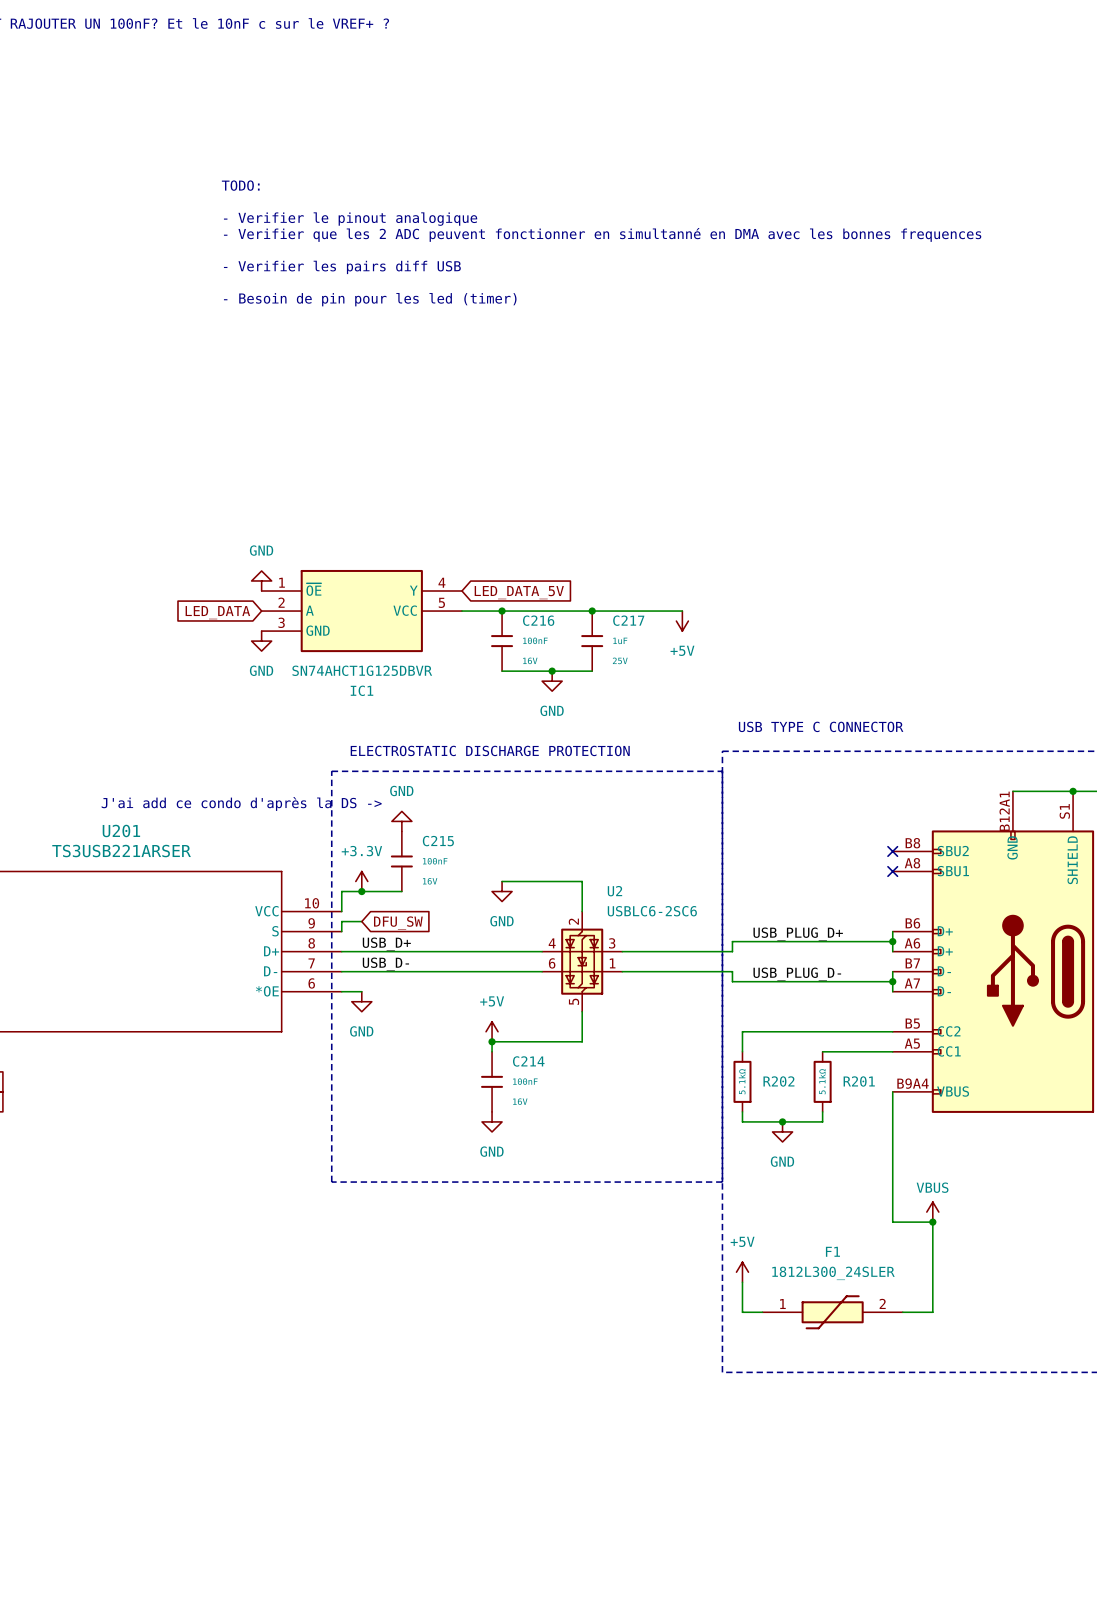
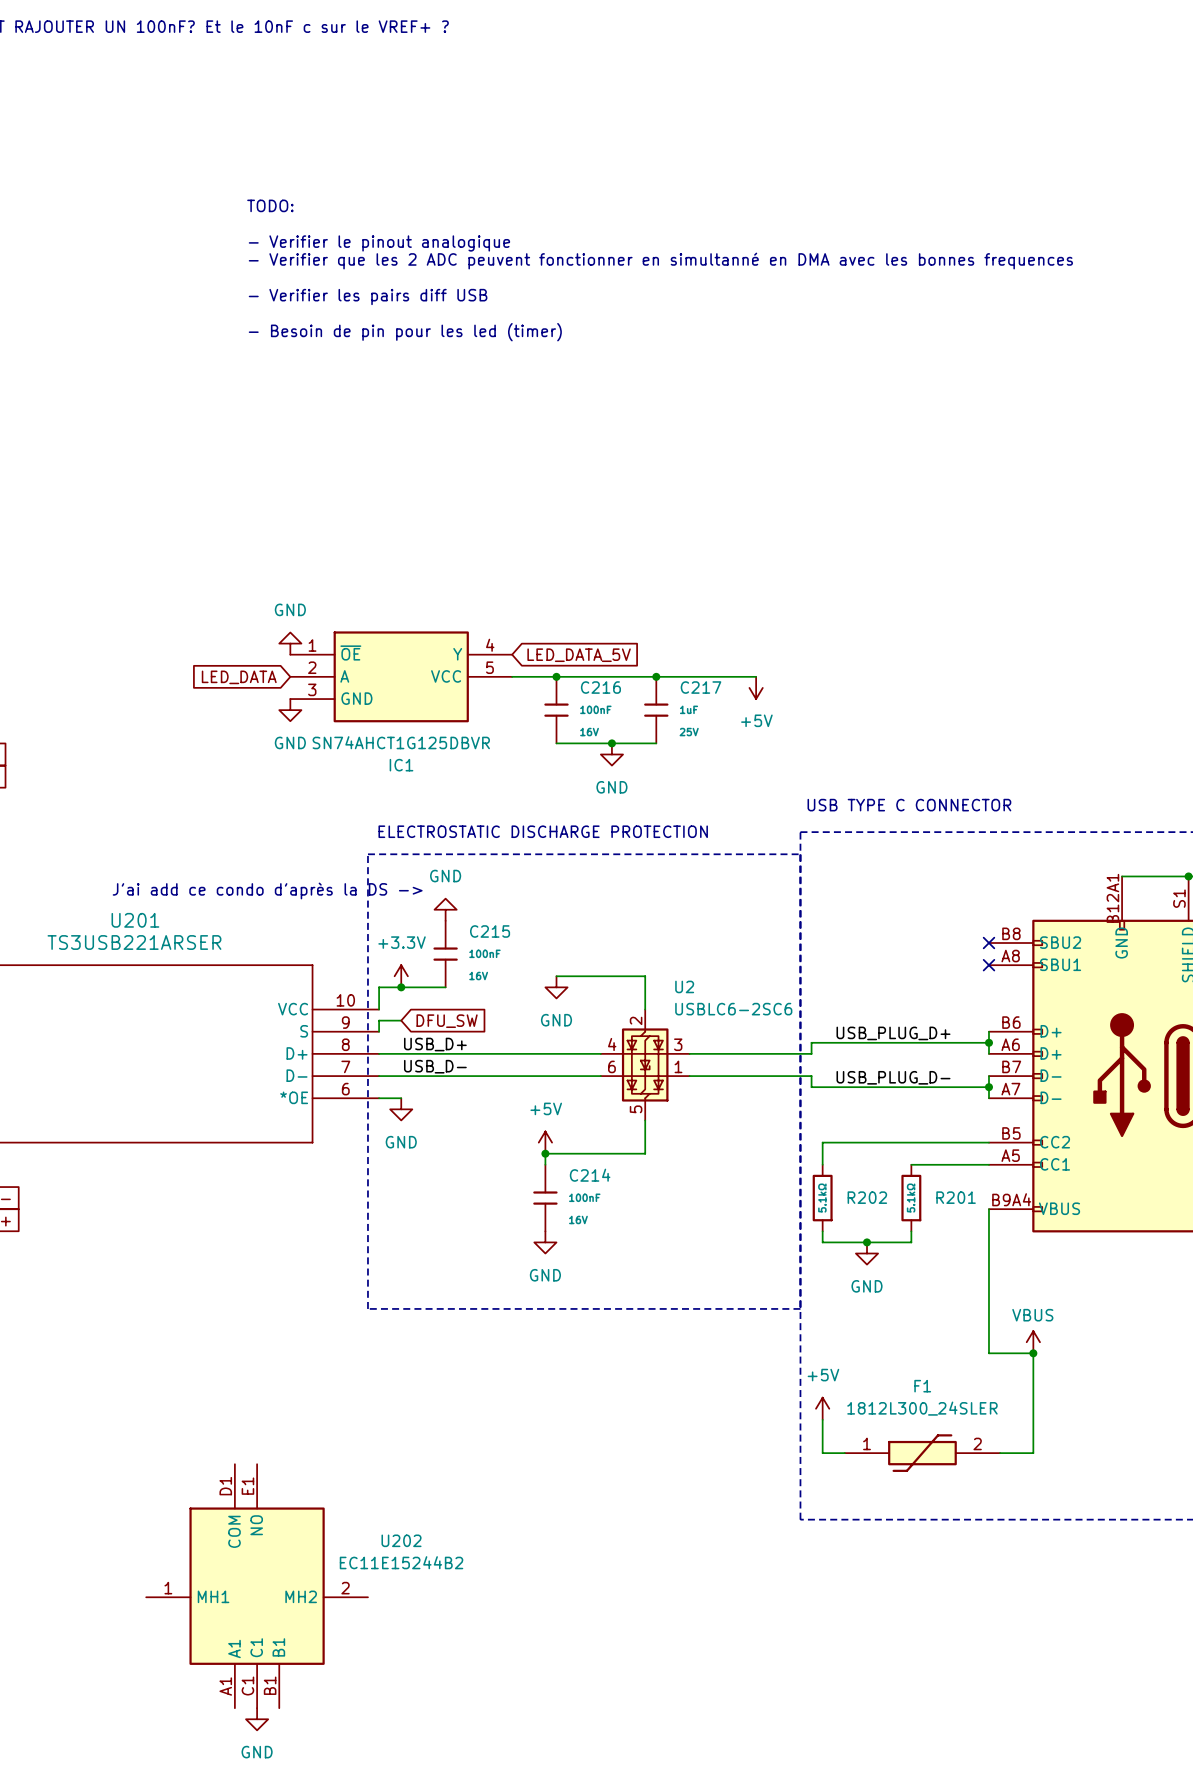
U202: none -> EC11E15244B2 (257, 1586)
power symbol: none -> GND (257, 1719)

